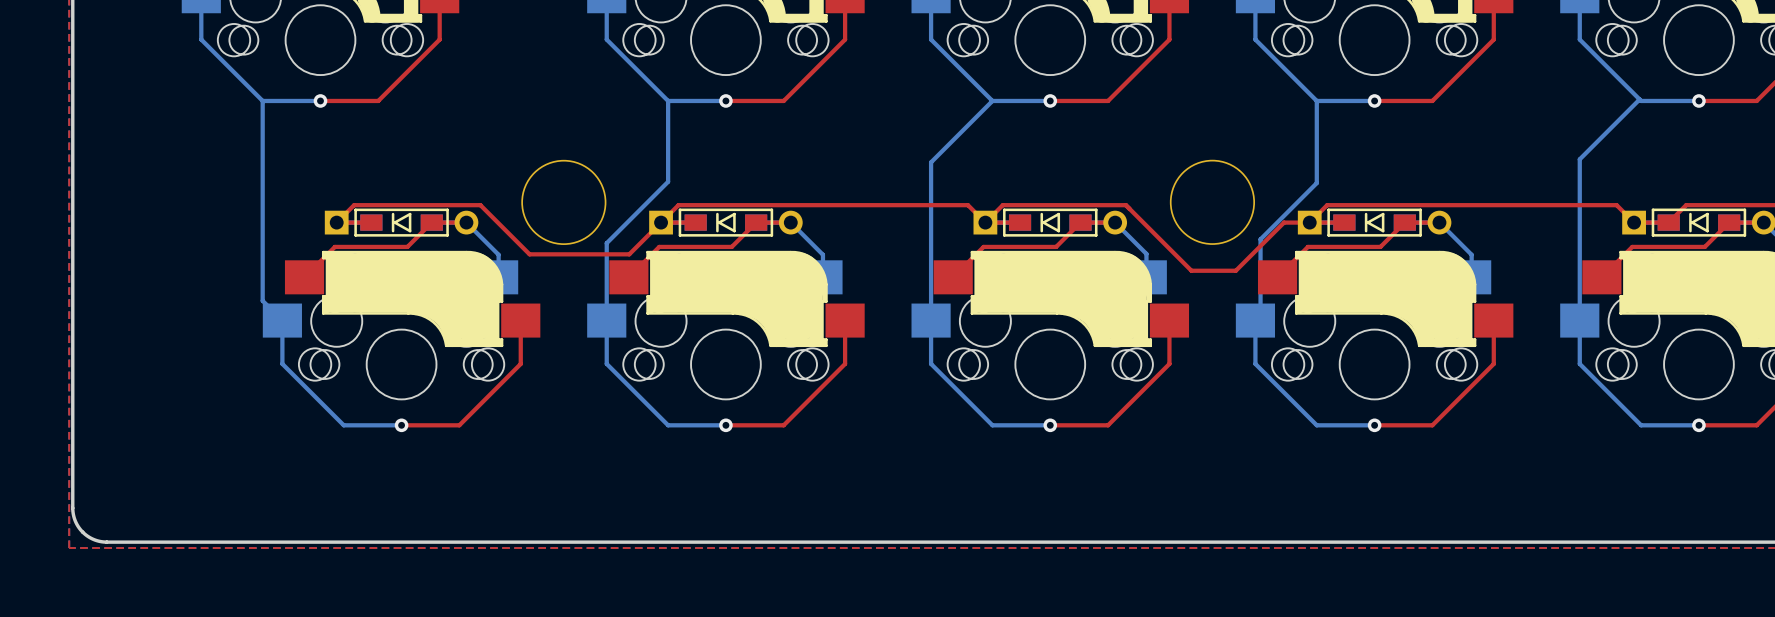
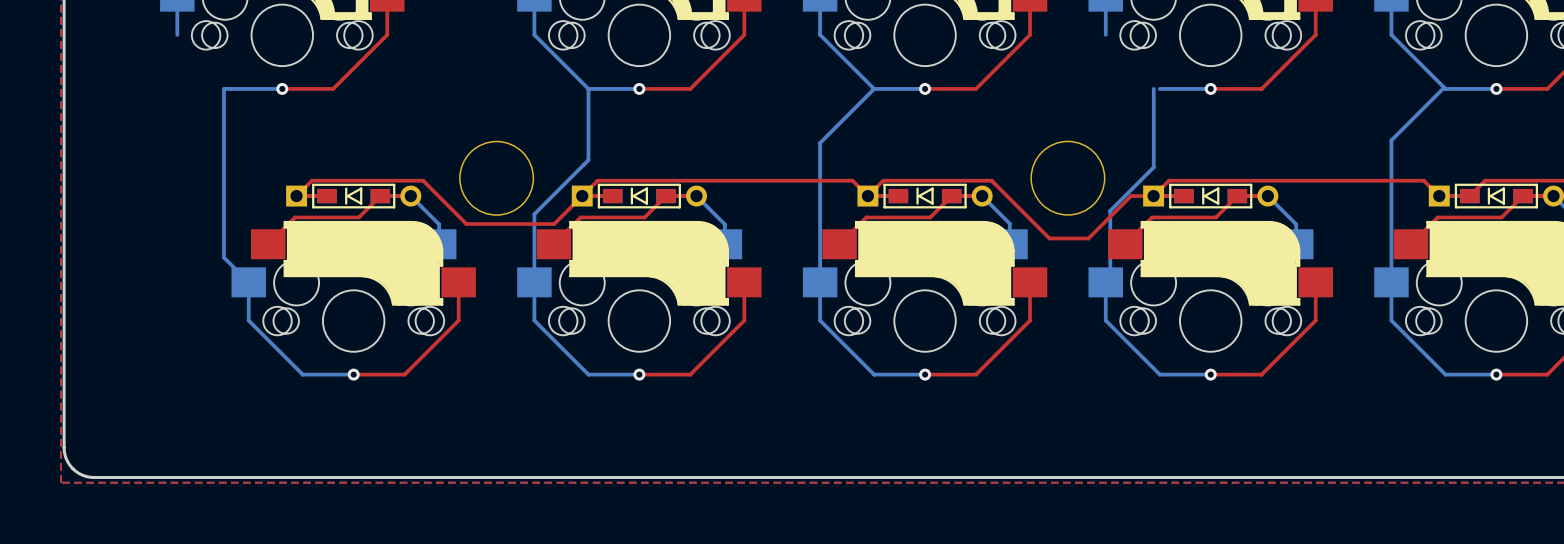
bottom track: (201, 39) (262, 100) (262, 300) (282, 320) -> (231, 88) (223, 88) (223, 257) (248, 282)
bottom track: (1255, 39) (1316, 100) (1316, 183) (1309, 189) -> (1153, 88) (1153, 167)

